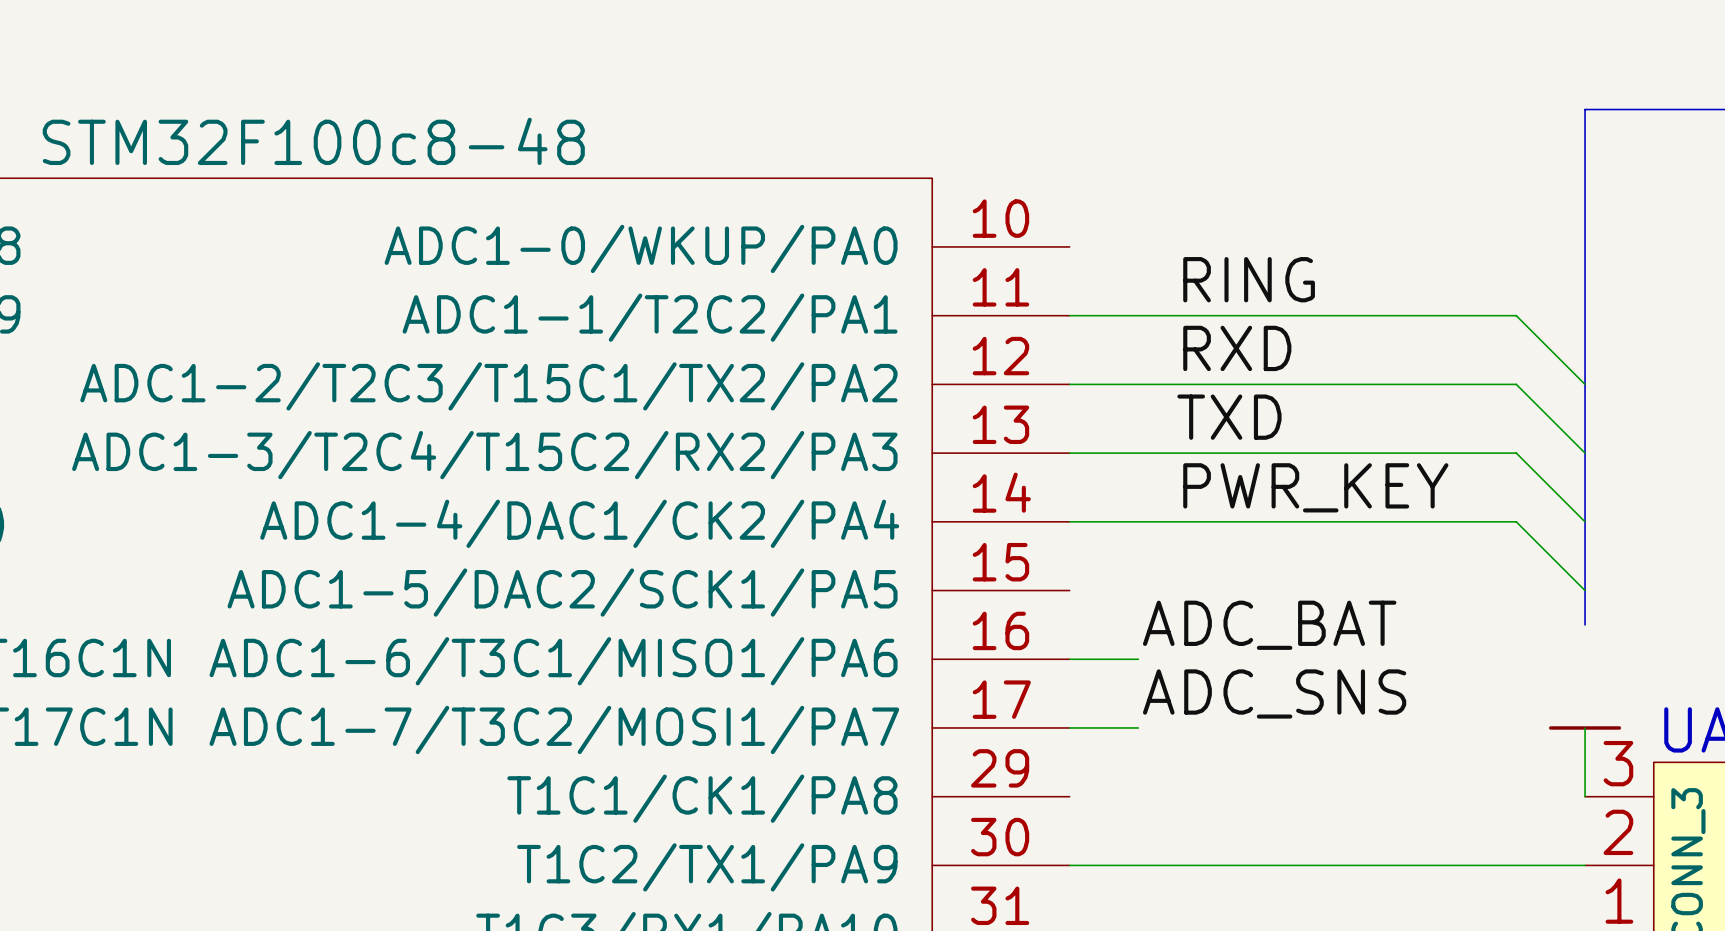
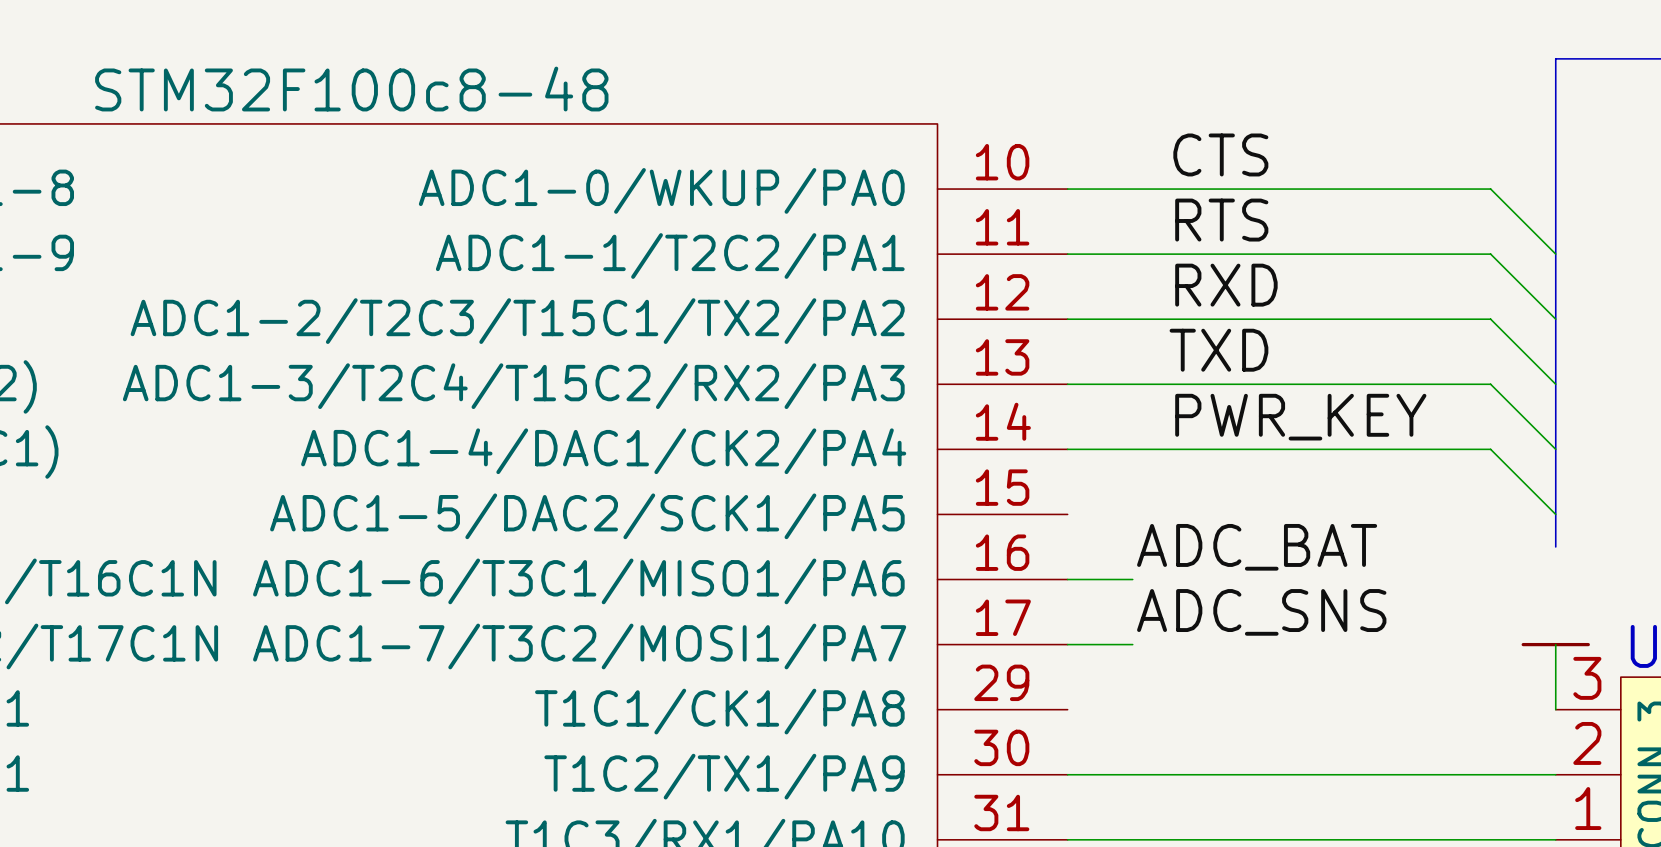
label: none -> CTS (1220, 154)
wire: none -> (1067, 189) (1490, 189) (1555, 254)
label: RING (1249, 279) -> RTS (1221, 220)

